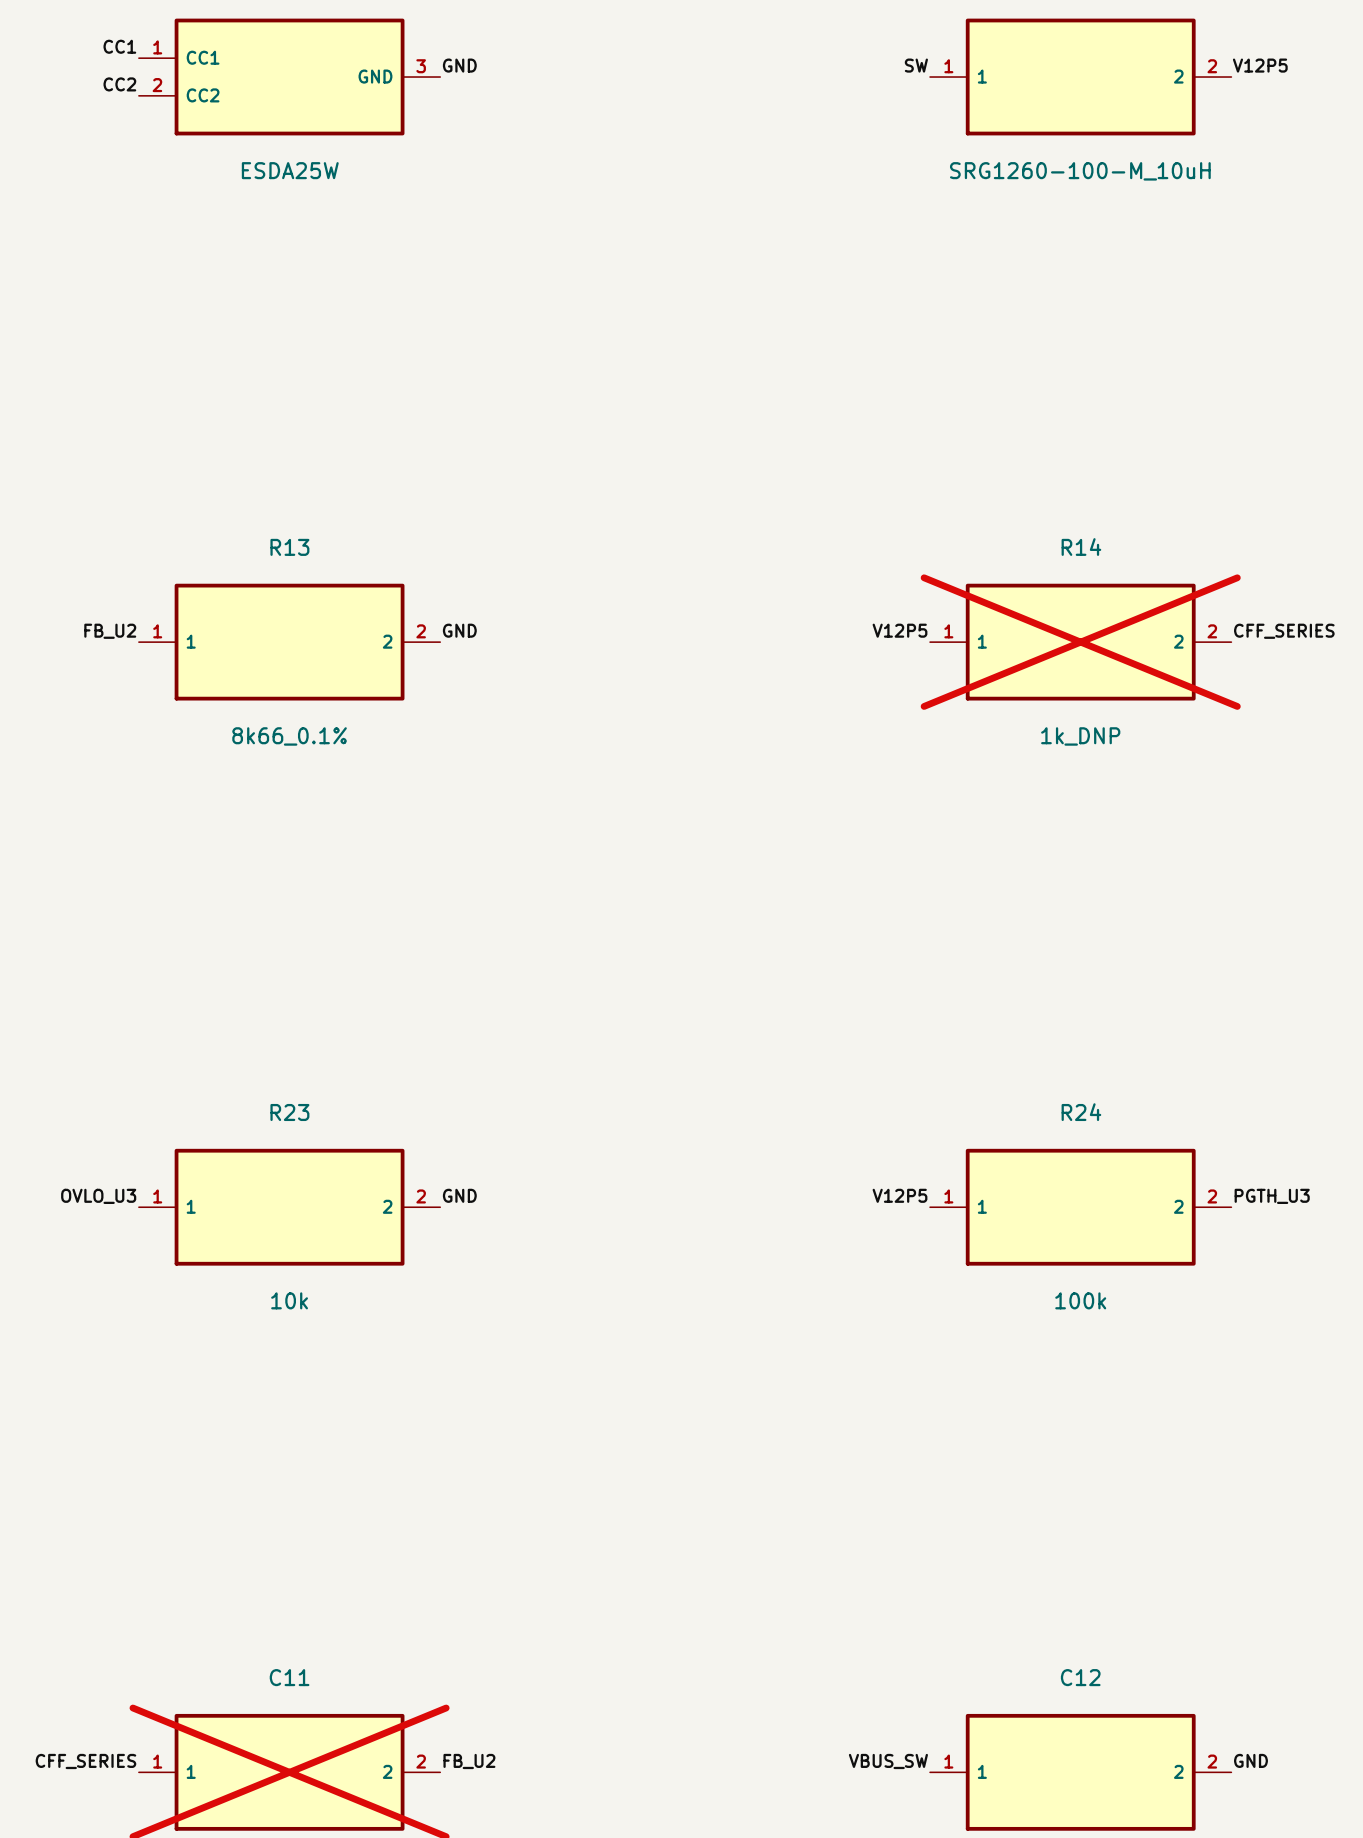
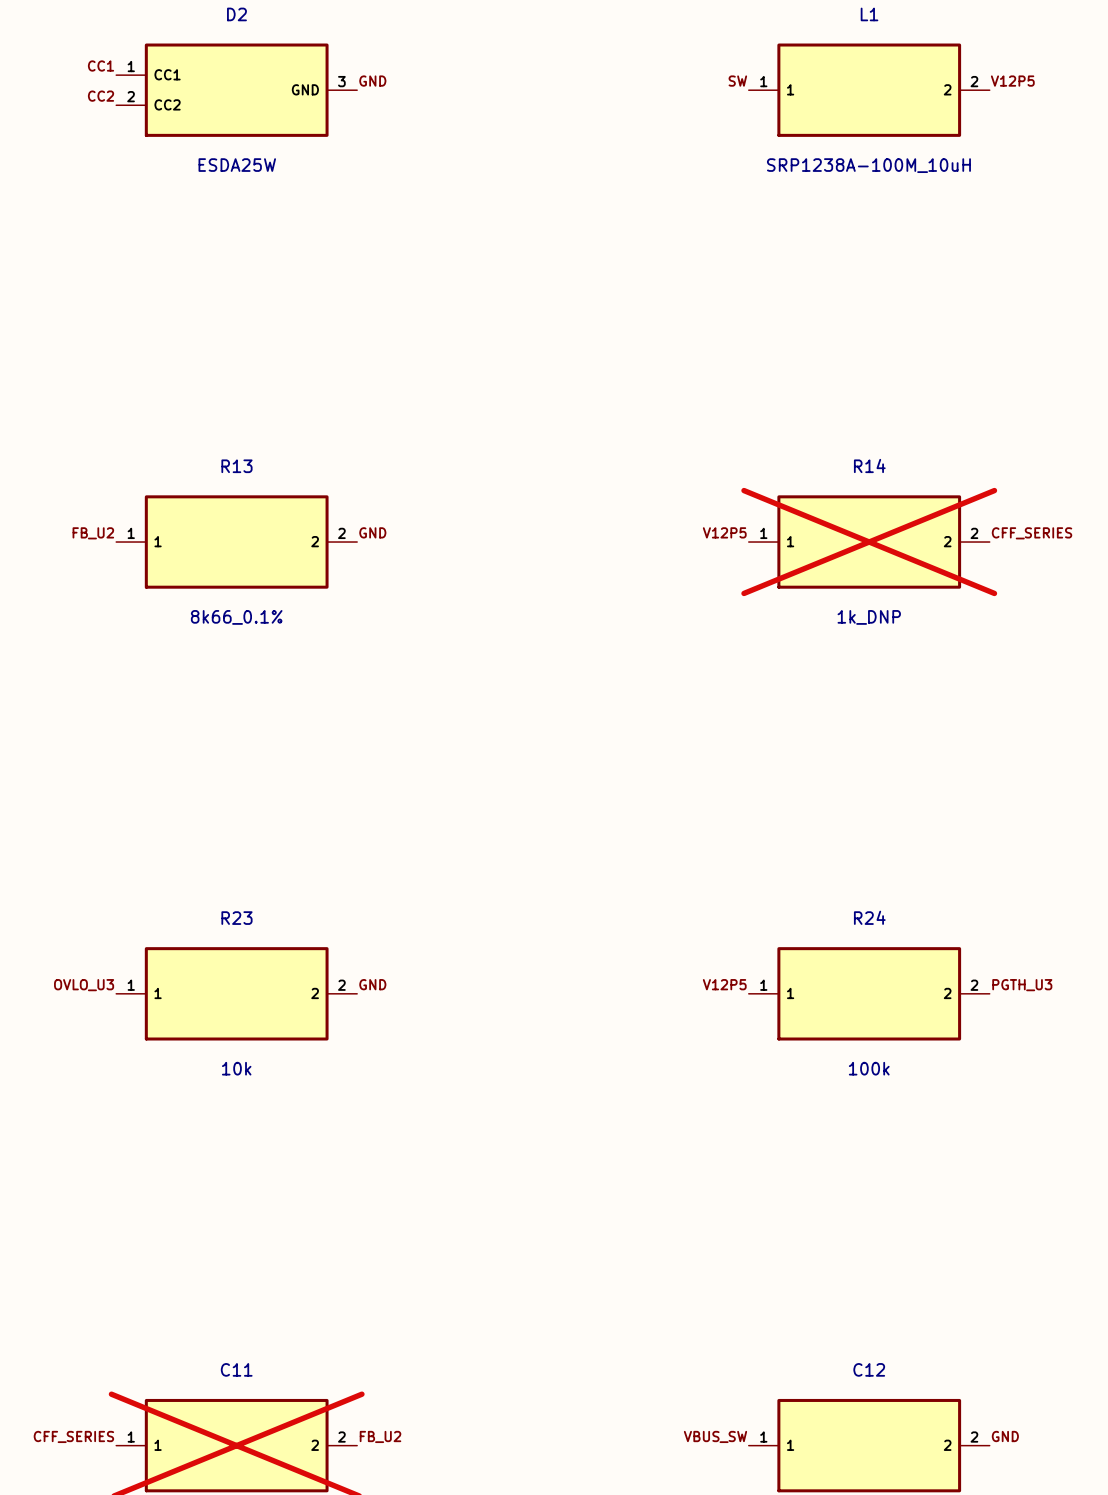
L1 value: SRG1260-100-M_10uH (1080, 171) -> SRP1238A-100M_10uH (868, 165)

